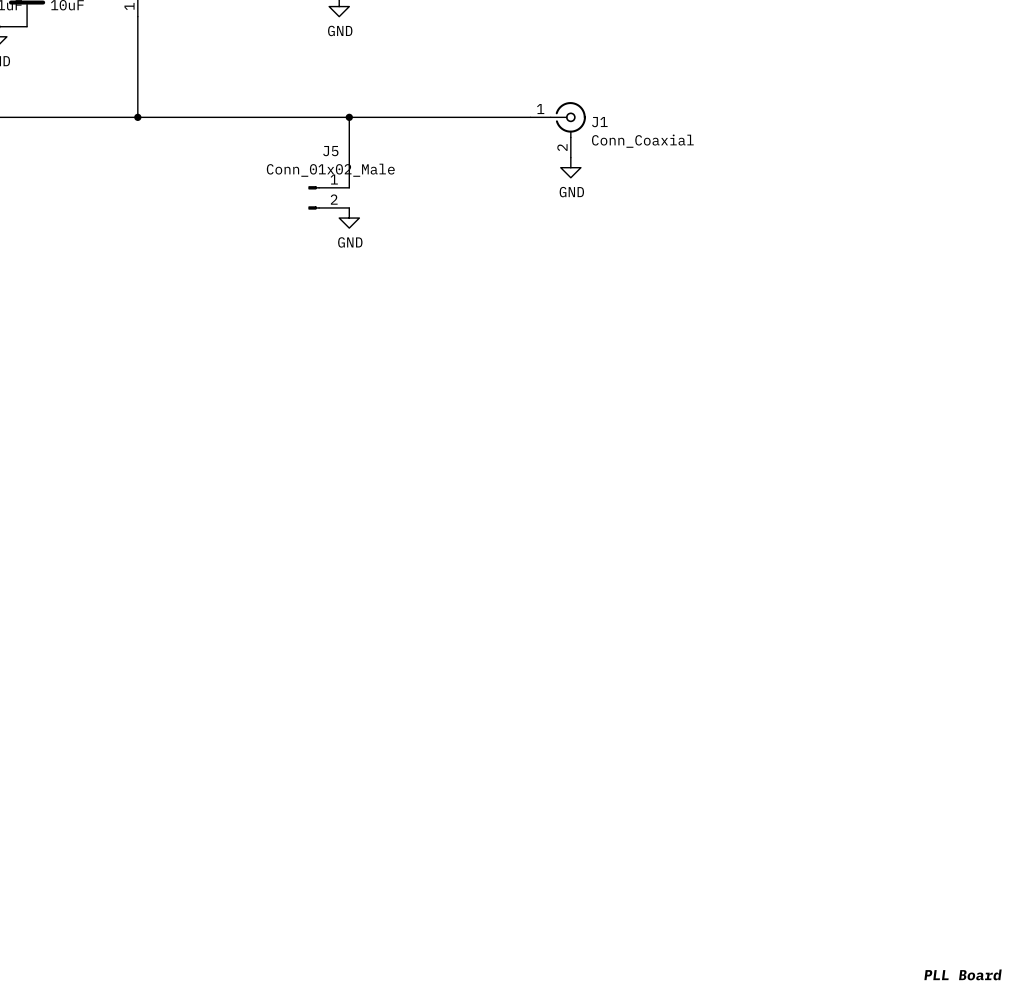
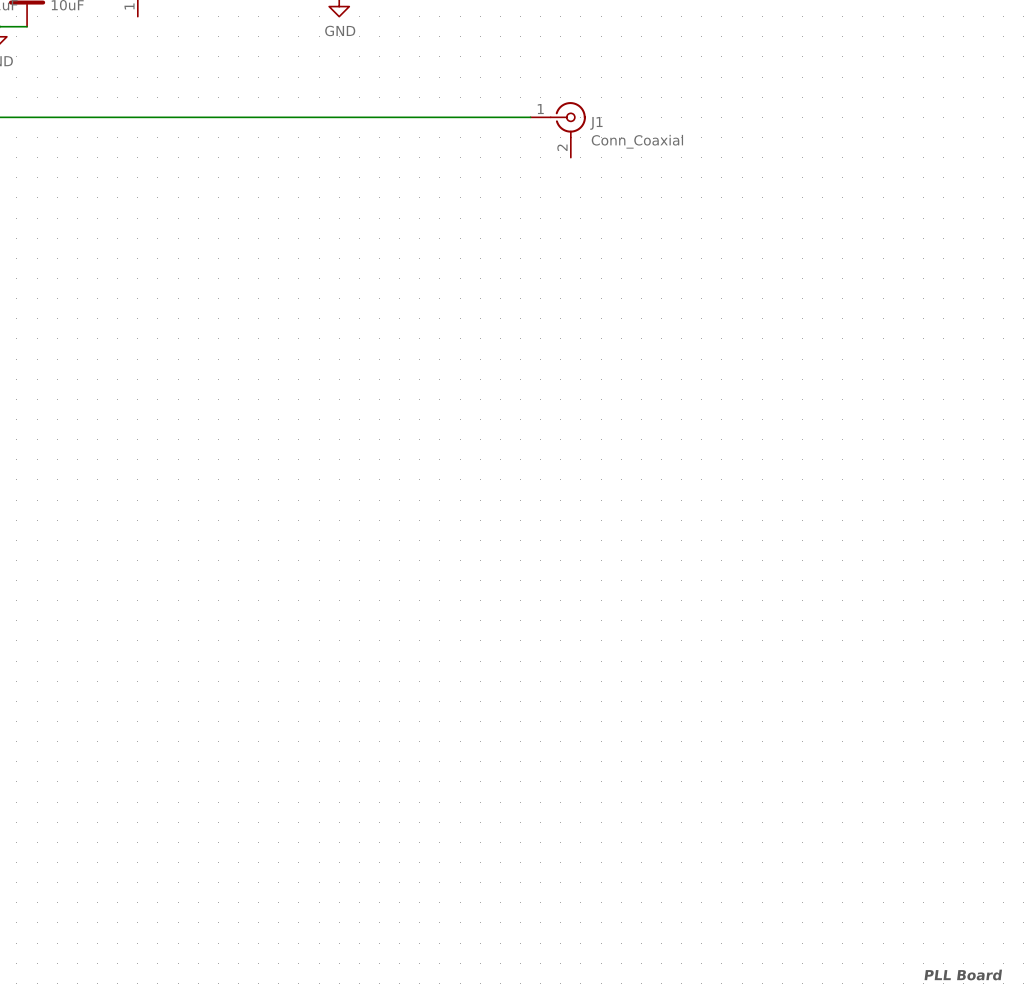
wire: (137, 16) (137, 117) -> none
junction: (137, 117) -> none
wire: (349, 117) (349, 187) -> none
junction: (349, 117) -> none
power symbol: GND (570, 167) -> none
J5: Conn_01x02_Male (328, 197) -> none
power symbol: GND (349, 218) -> none

